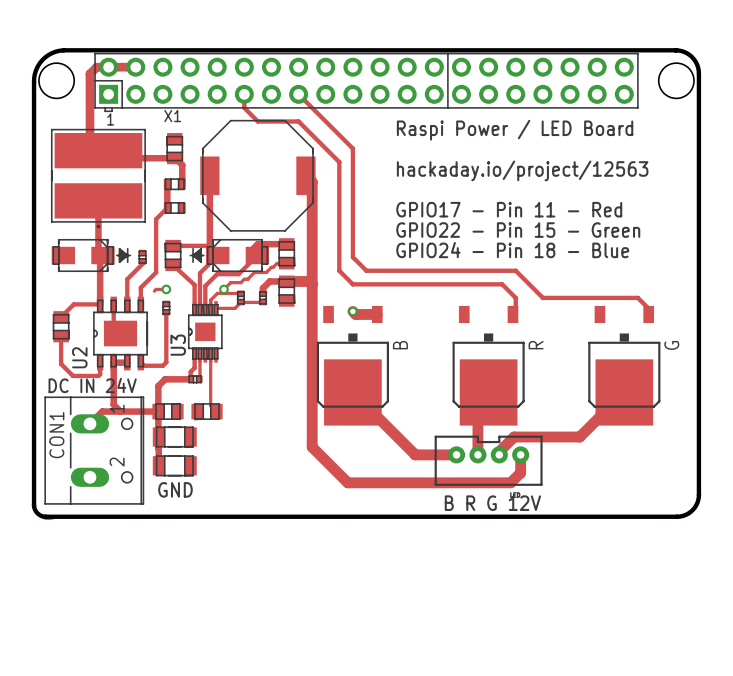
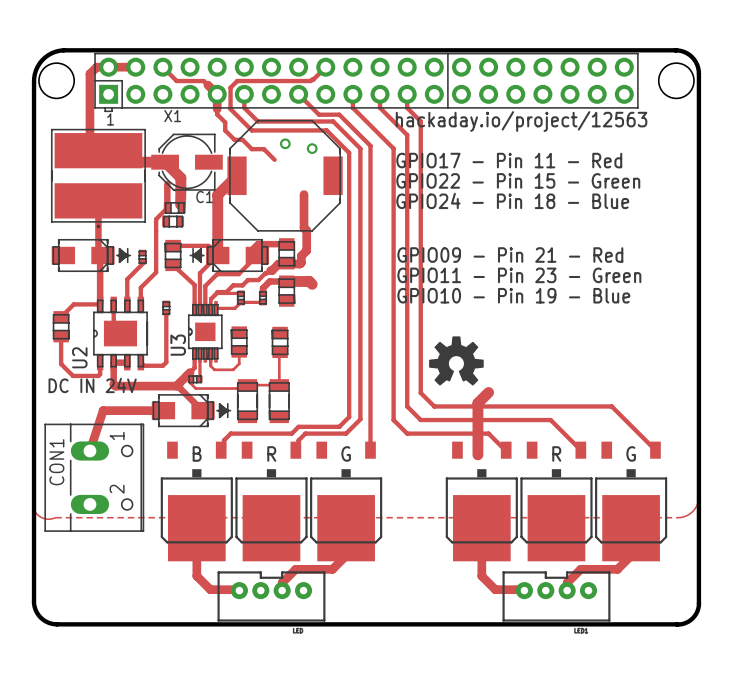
track: none -> (162, 67) (176, 81) (203, 81) (217, 94) (217, 114) (225, 122) (225, 130) (234, 139) (242, 139) (251, 149) (263, 149) (274, 159)
track: none -> (325, 67) (310, 81) (237, 81) (230, 87) (230, 109) (251, 130) (326, 130) (349, 152) (349, 417) (339, 426) (298, 426) (291, 433) (230, 433) (223, 440) (223, 447)
track: none -> (352, 94) (352, 107) (393, 148) (393, 420) (407, 433) (488, 433) (506, 450)
track: none -> (380, 94) (380, 107) (407, 135) (407, 406) (420, 420) (550, 420) (580, 450)
track: none -> (407, 94) (407, 107) (420, 121) (420, 392) (434, 406) (611, 406) (655, 450)
track: (318, 114) (352, 148) (352, 257) (366, 270) (515, 270) (542, 297) (637, 297) (651, 311) -> (318, 114) (339, 114) (370, 145) (370, 450)
track: (298, 121) (339, 162) (339, 270) (352, 284) (502, 284) (515, 297) (515, 311) (512, 314) -> (298, 121) (333, 121) (360, 148) (360, 419) (346, 433) (305, 433) (298, 440) (298, 447)
text: Raspi Power / LED Board (515, 130) -> none
via: none -> (285, 143)
part: (174, 148) -> none
via: none -> (312, 148)
track: (118, 158) (175, 158) (182, 165) (182, 184) -> (118, 158) (122, 162) (165, 162) (180, 177) (180, 204)
C1: none -> (187, 162)
text position: hackaday.io/project/12563 (522, 170) -> hackaday.io/project/12563 (521, 121)
track: (209, 175) (209, 247) -> none
track: none -> (237, 175) (217, 195) (217, 255)
part position: (257, 175) -> (285, 175)
track: (305, 175) (312, 182) (312, 447) (347, 482) (510, 482) (520, 472) (520, 454) -> none
part position: (174, 184) -> (173, 221)
track: none -> (304, 194) (304, 227) (306, 230) (306, 250) (301, 256) (301, 262) (278, 264) (258, 280) (247, 280) (242, 285) (233, 285) (226, 292) (217, 292) (210, 300)
text position: GPIO17 - Pin 11 - Red (509, 209) -> GPIO17 - Pin 11 - Red (509, 160)
text position: GPIO22 - Pin 15 - Green (518, 230) -> GPIO22 - Pin 15 - Green (518, 180)
text position: GPIO24 - Pin 18 - Blue (512, 250) -> GPIO24 - Pin 18 - Blue (512, 200)
text: none -> GPIO09 - Pin 21 - Red (510, 255)
track: (286, 263) (277, 263) (266, 272) (254, 272) (247, 279) (244, 279) (240, 282) (230, 282) (223, 289) -> none
text: none -> GPIO11 - Pin 23 - Green (519, 275)
track: (166, 289) (154, 291) -> none
via: (166, 289) -> none
via: (223, 289) -> none
text: none -> GPIO10 - Pin 19 - Blue (513, 295)
track: (352, 311) (355, 314) (377, 314) -> none
via: (352, 311) -> none
drawing: none -> [429, 336, 484, 386]
part: none -> (239, 342)
part: none -> (279, 342)
track: none -> (280, 352) (278, 354) (279, 385) (247, 385) (237, 388) (195, 388) (186, 375)
track: (210, 365) (210, 405) (216, 411) -> (210, 365) (214, 369) (233, 369) (239, 363) (239, 351)
B: (352, 365) -> none
R: (488, 365) -> none
G: (624, 365) -> none
track: (190, 371) (190, 379) (165, 379) (158, 386) (158, 465) -> none
track: none -> (179, 382) (179, 388) (203, 410)
track: (113, 384) (113, 404) (120, 411) -> (113, 384) (115, 386) (176, 386) (190, 371)
track: (352, 392) (415, 454) (456, 454) -> none
track: (624, 392) (579, 437) (514, 437) (499, 451) (499, 454) -> none
part: none -> (247, 401)
part: none -> (279, 401)
track: none -> (163, 410) (103, 410) (89, 451)
part: none -> (191, 410)
track: (158, 411) (102, 411) (89, 423) -> none
part: (168, 411) -> none
part: (207, 411) -> none
part: (174, 437) -> none
CON1 position: (94, 450) -> (94, 477)
text: none -> B (197, 453)
text: none -> R (271, 453)
text: none -> G (346, 453)
text: none -> R (556, 453)
text: none -> G (631, 453)
part position: (488, 460) -> (271, 596)
part: (174, 465) -> none
text: GND (175, 489) -> none
board edge: (698, 494) (697, 503) (692, 510) (685, 515) (676, 516) (45, 516) (37, 513) (33, 504) -> none
board edge: none -> (698, 495) (698, 603)
part: none -> (196, 501)
part: none -> (271, 501)
part: none -> (346, 501)
part: none -> (481, 501)
part: none -> (556, 501)
part: none -> (631, 501)
text: B R G 12V (492, 503) -> none
board edge: none -> (34, 506) (34, 601)
track: none -> (196, 528) (196, 576) (210, 589) (239, 590)
track: none -> (346, 528) (346, 555) (332, 569) (295, 569) (282, 582) (282, 590)
track: none -> (631, 528) (631, 555) (617, 569) (580, 569) (567, 582) (567, 590)
track: none -> (481, 548) (481, 528) (481, 576) (495, 589) (524, 590)
part: none -> (556, 596)
board edge: none -> (33, 601) (35, 610) (40, 617) (48, 622) (57, 624) (676, 624)
board edge: none -> (699, 603) (697, 611) (692, 618) (685, 622) (676, 624)

